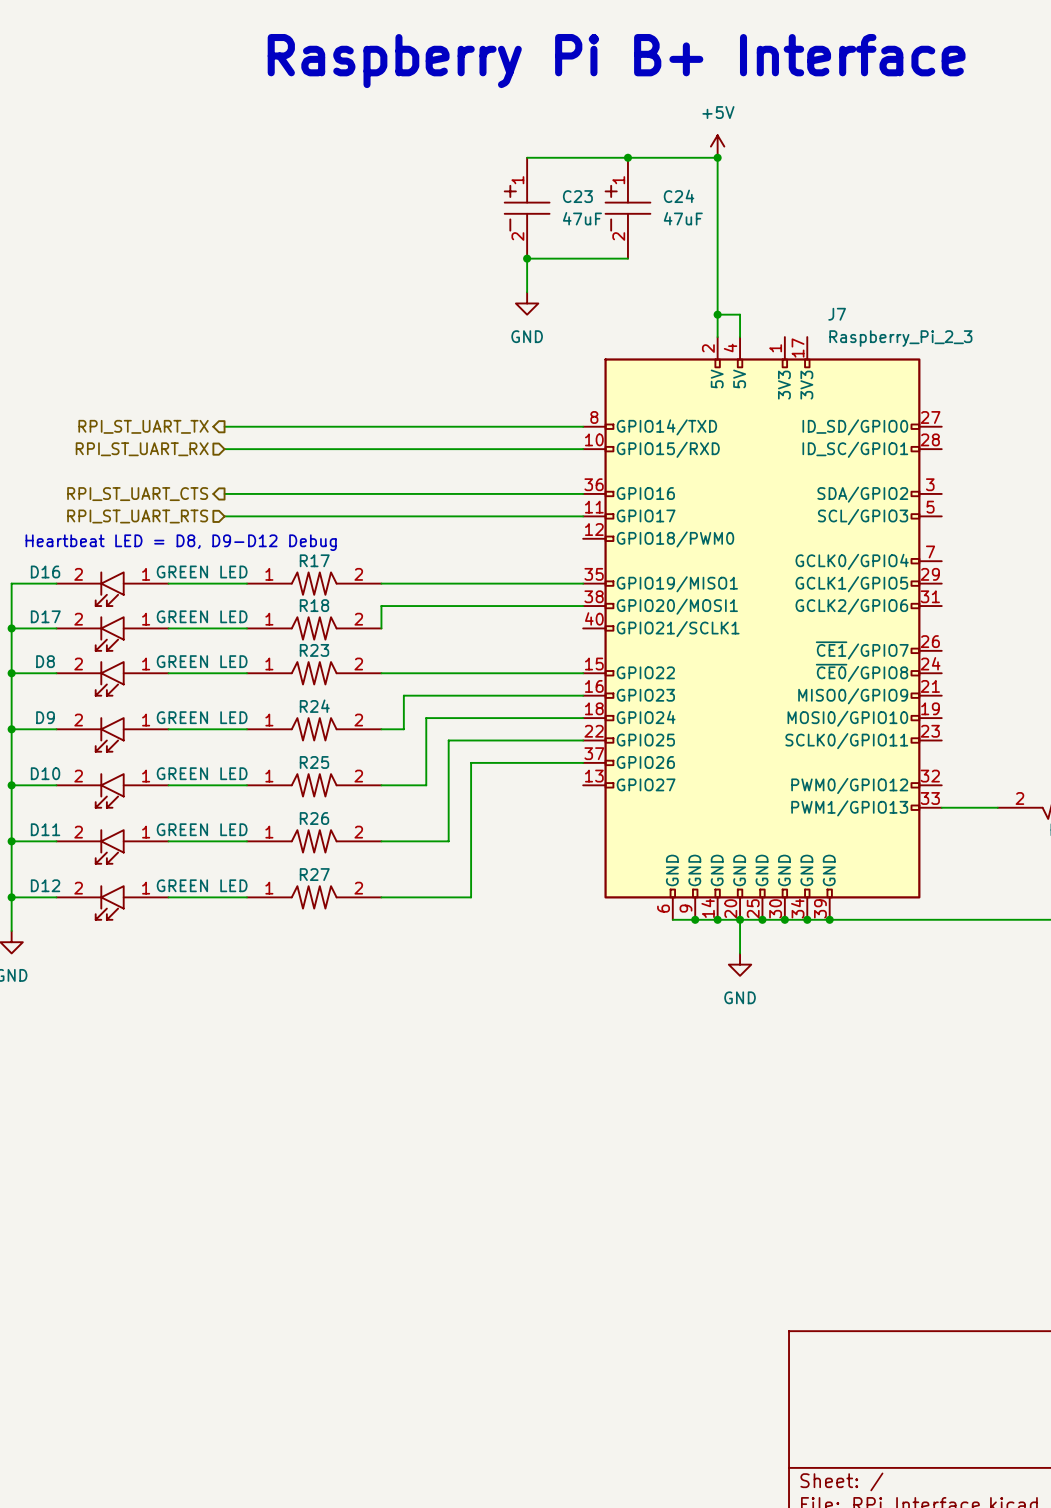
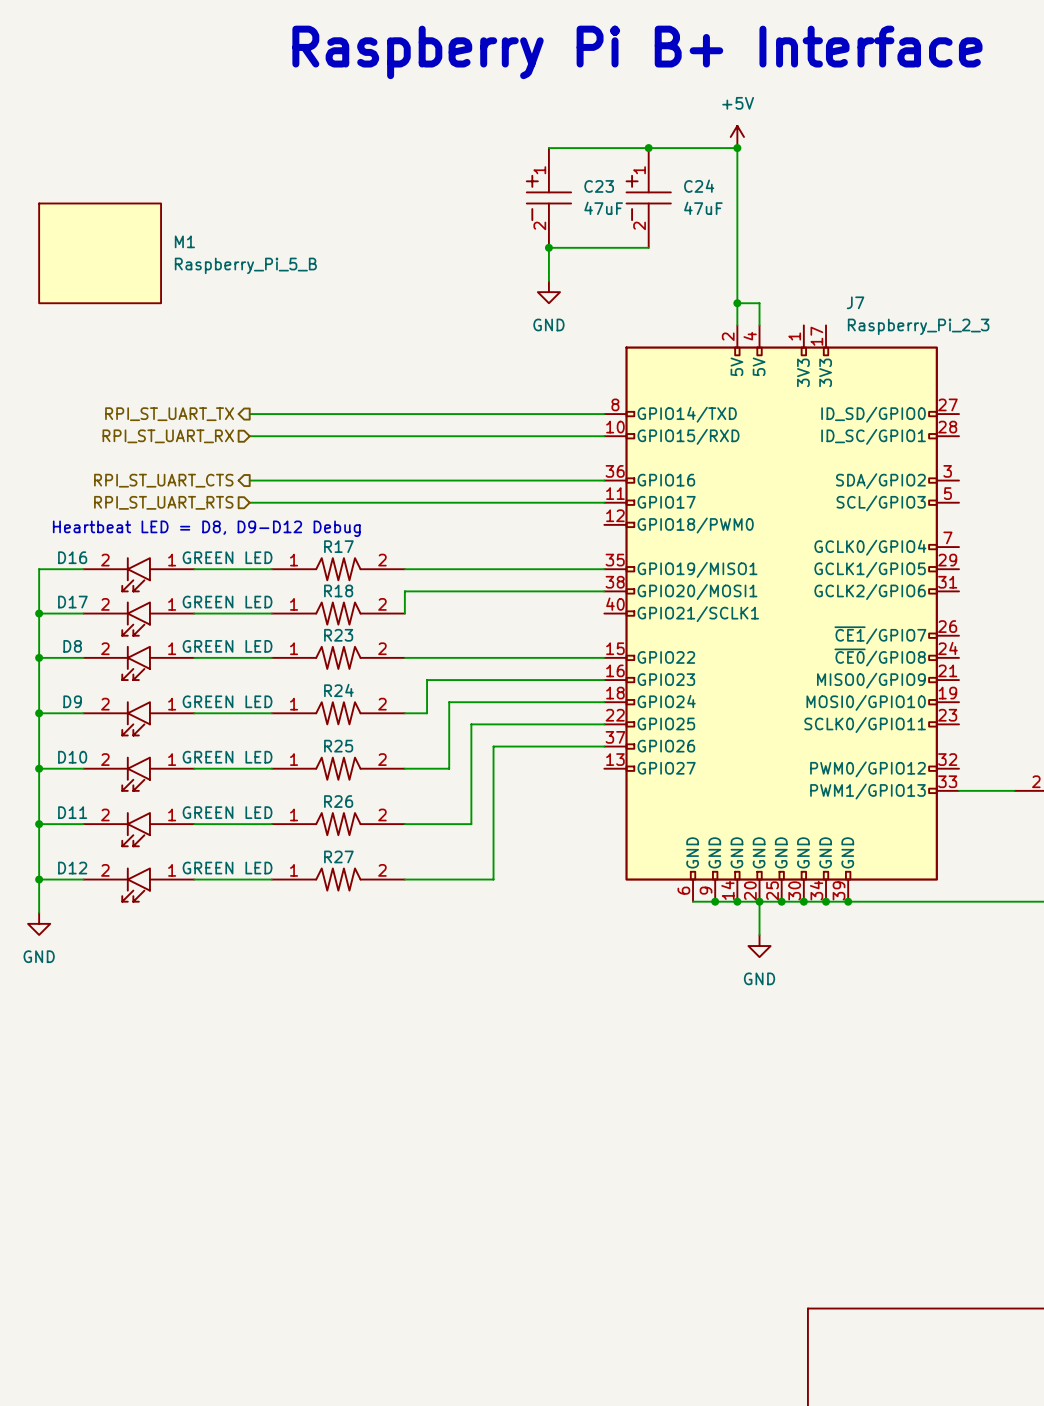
M1: none -> (100, 253)

